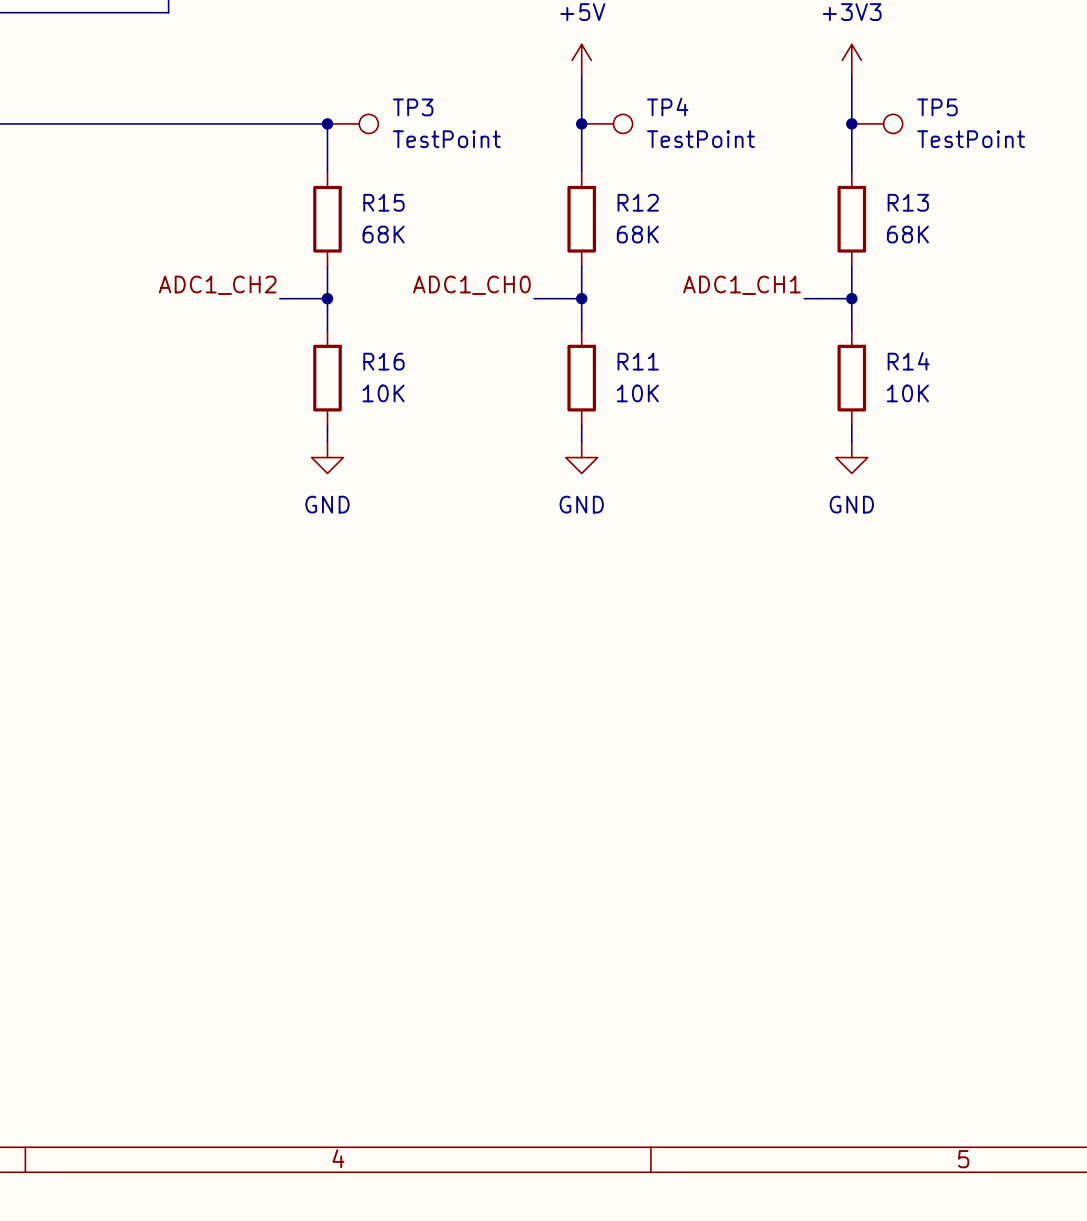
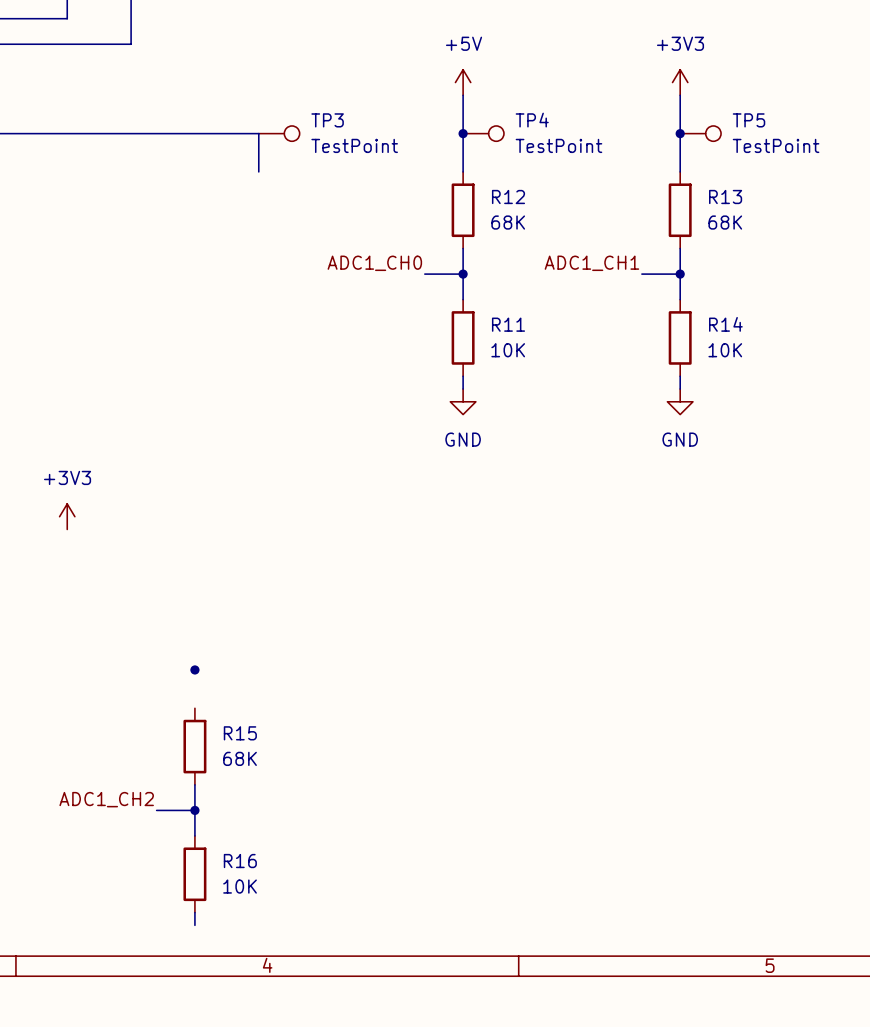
junction: (327, 123) -> none
R15 position: (327, 219) -> (194, 746)
wire: (327, 266) (327, 330) -> none
label: ADC1_CH2 (217, 285) -> none
wire: (279, 298) (327, 298) -> none
junction: (327, 298) -> none
R16 position: (327, 378) -> (194, 874)
wire: (327, 425) (327, 441) -> none
power symbol: GND (327, 457) -> none
power symbol: none -> +3V3 (67, 516)
junction: none -> (194, 669)
wire: none -> (194, 784) (194, 835)
label: none -> ADC1_CH2 (106, 799)
wire: none -> (156, 810) (194, 810)
junction: none -> (194, 810)
wire: none -> (194, 912) (194, 925)

